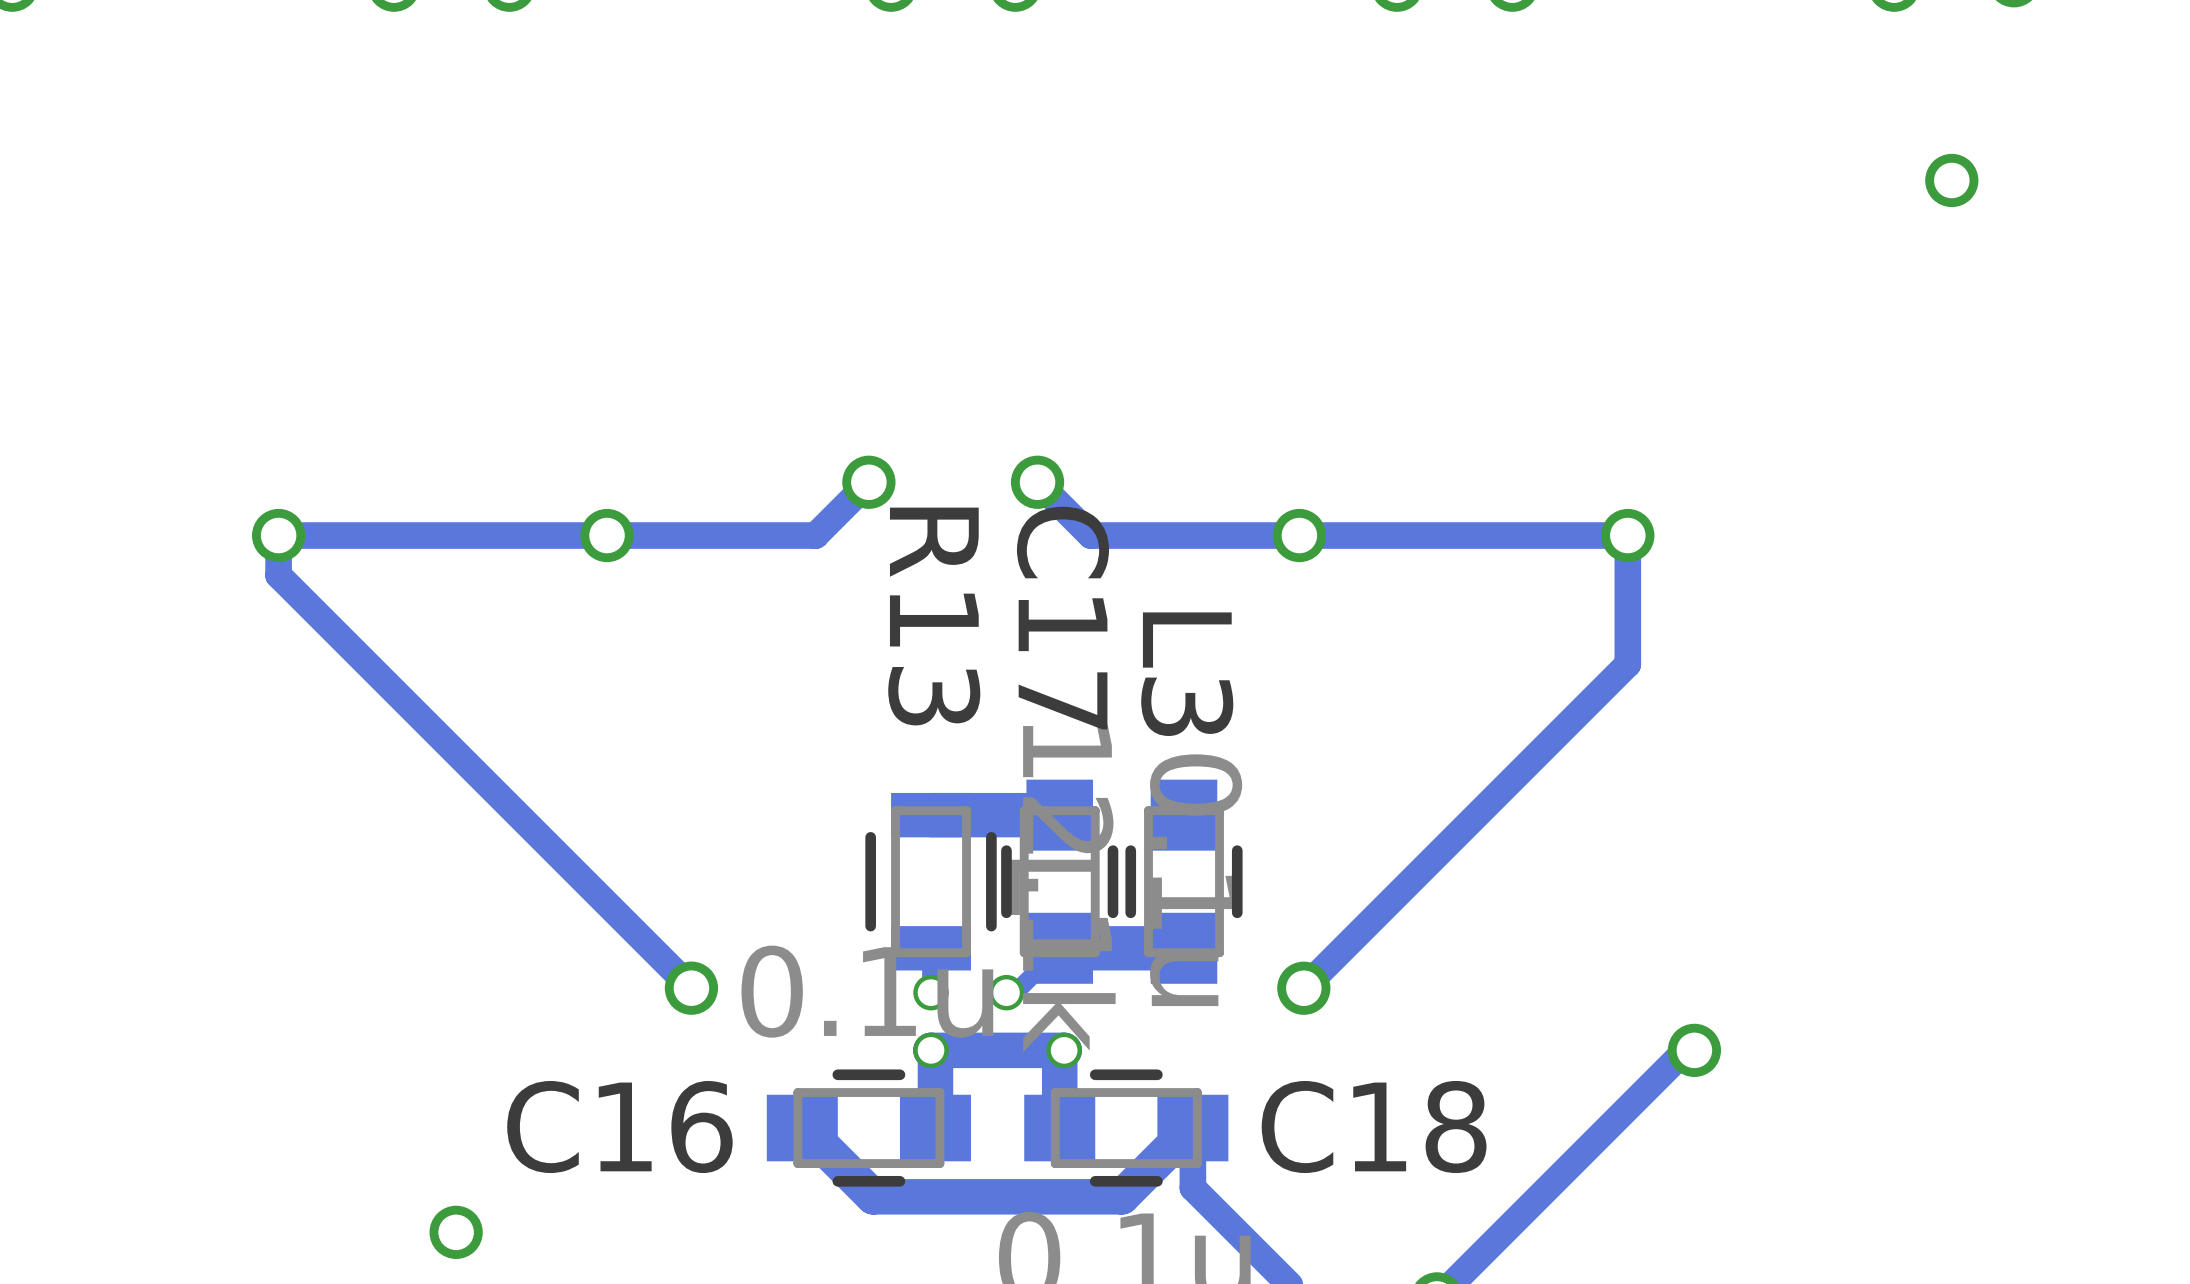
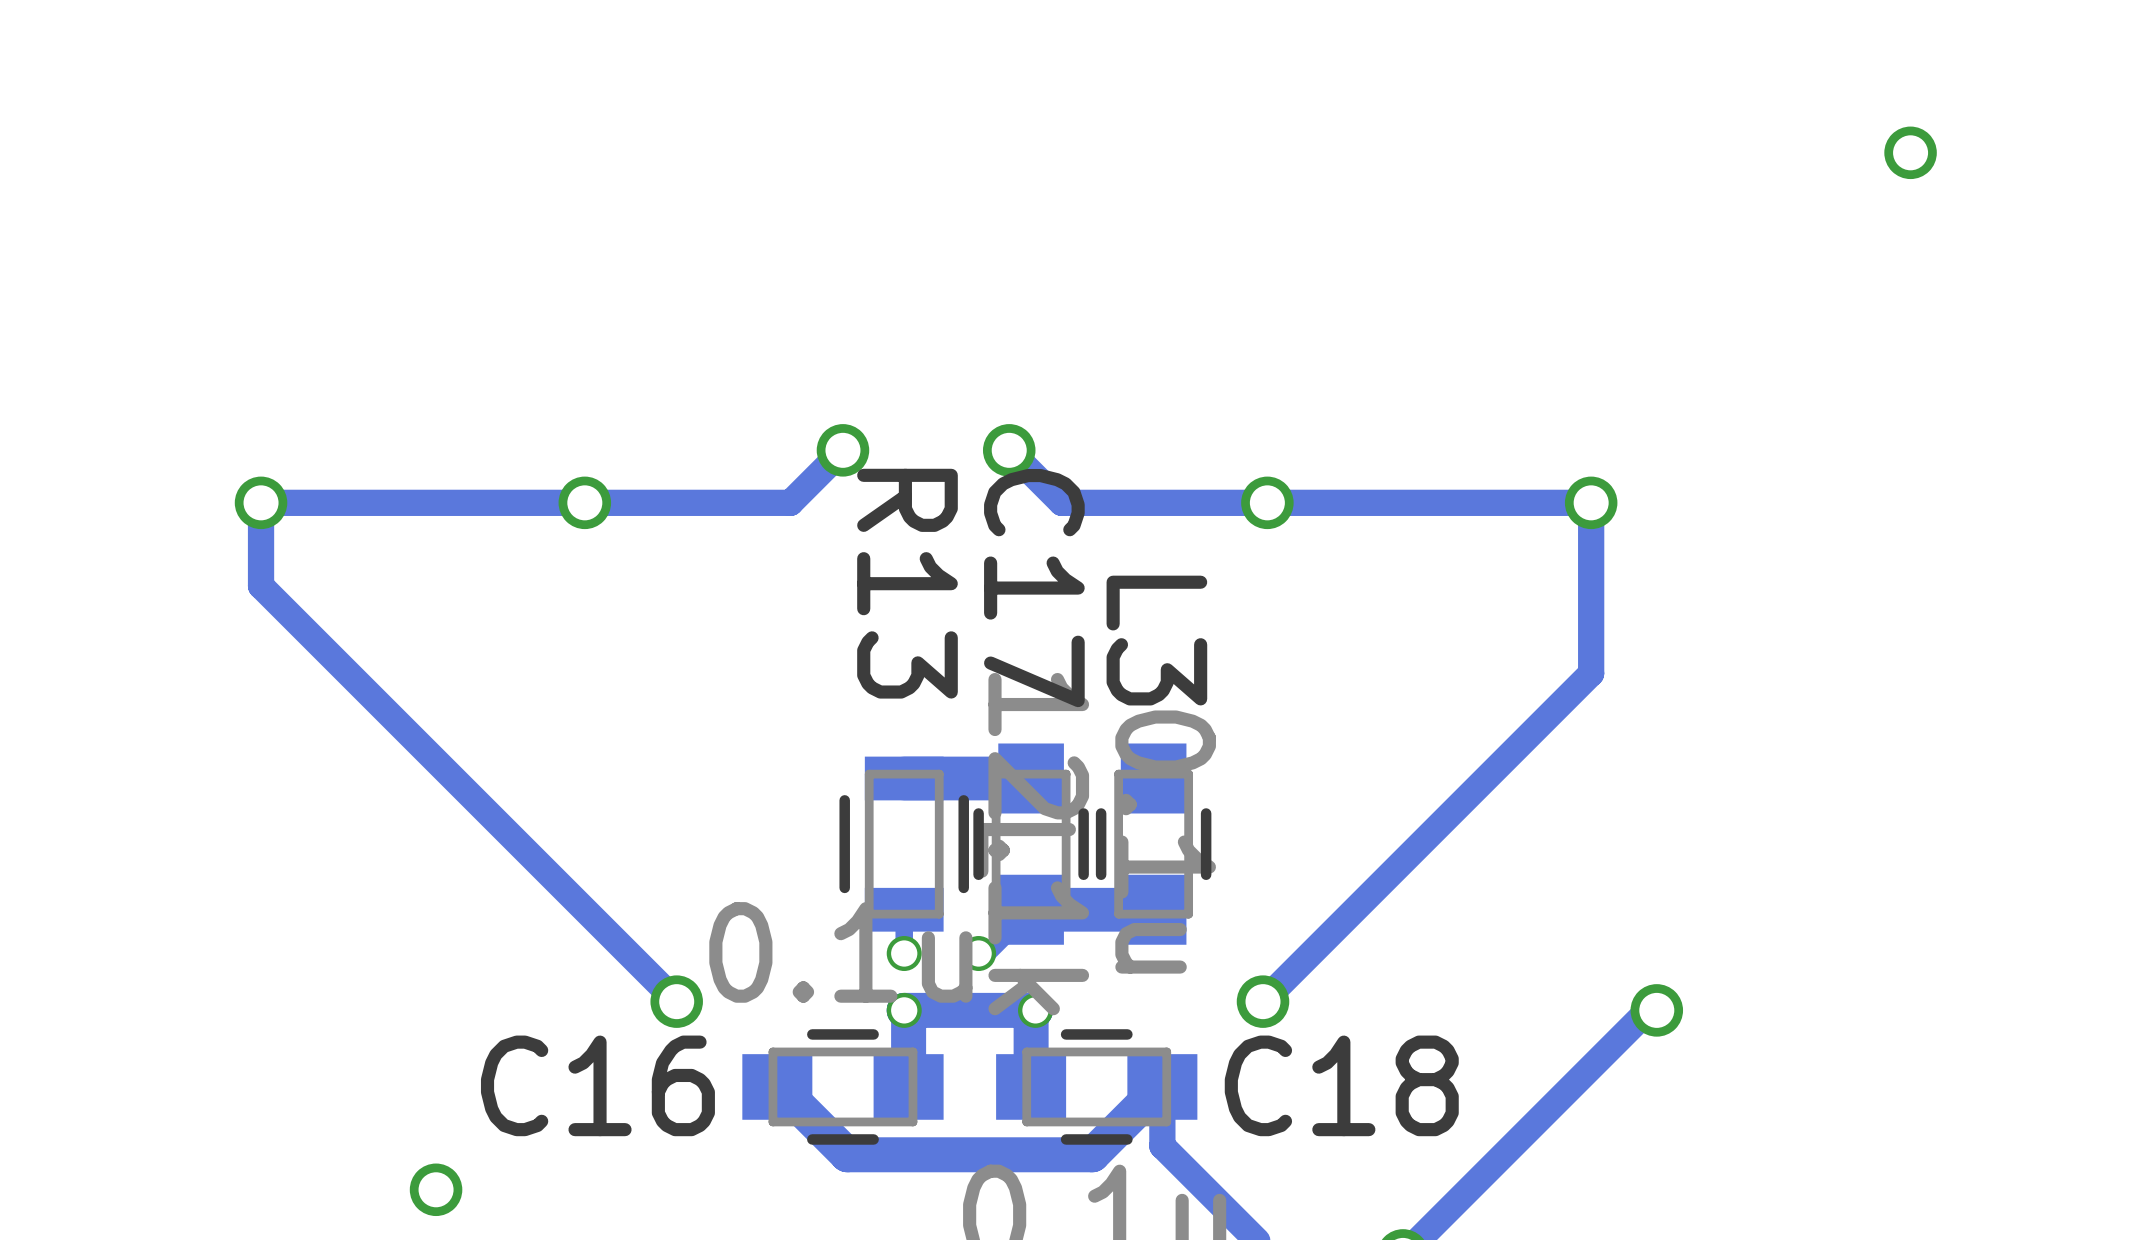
track: (278, 575) (691, 988) -> (261, 542) (261, 585) (676, 1001)
track: (1627, 664) (1303, 988) -> (1591, 629) (1591, 673) (1263, 1001)
via position: (691, 988) -> (676, 1001)
via position: (1303, 988) -> (1263, 1001)

